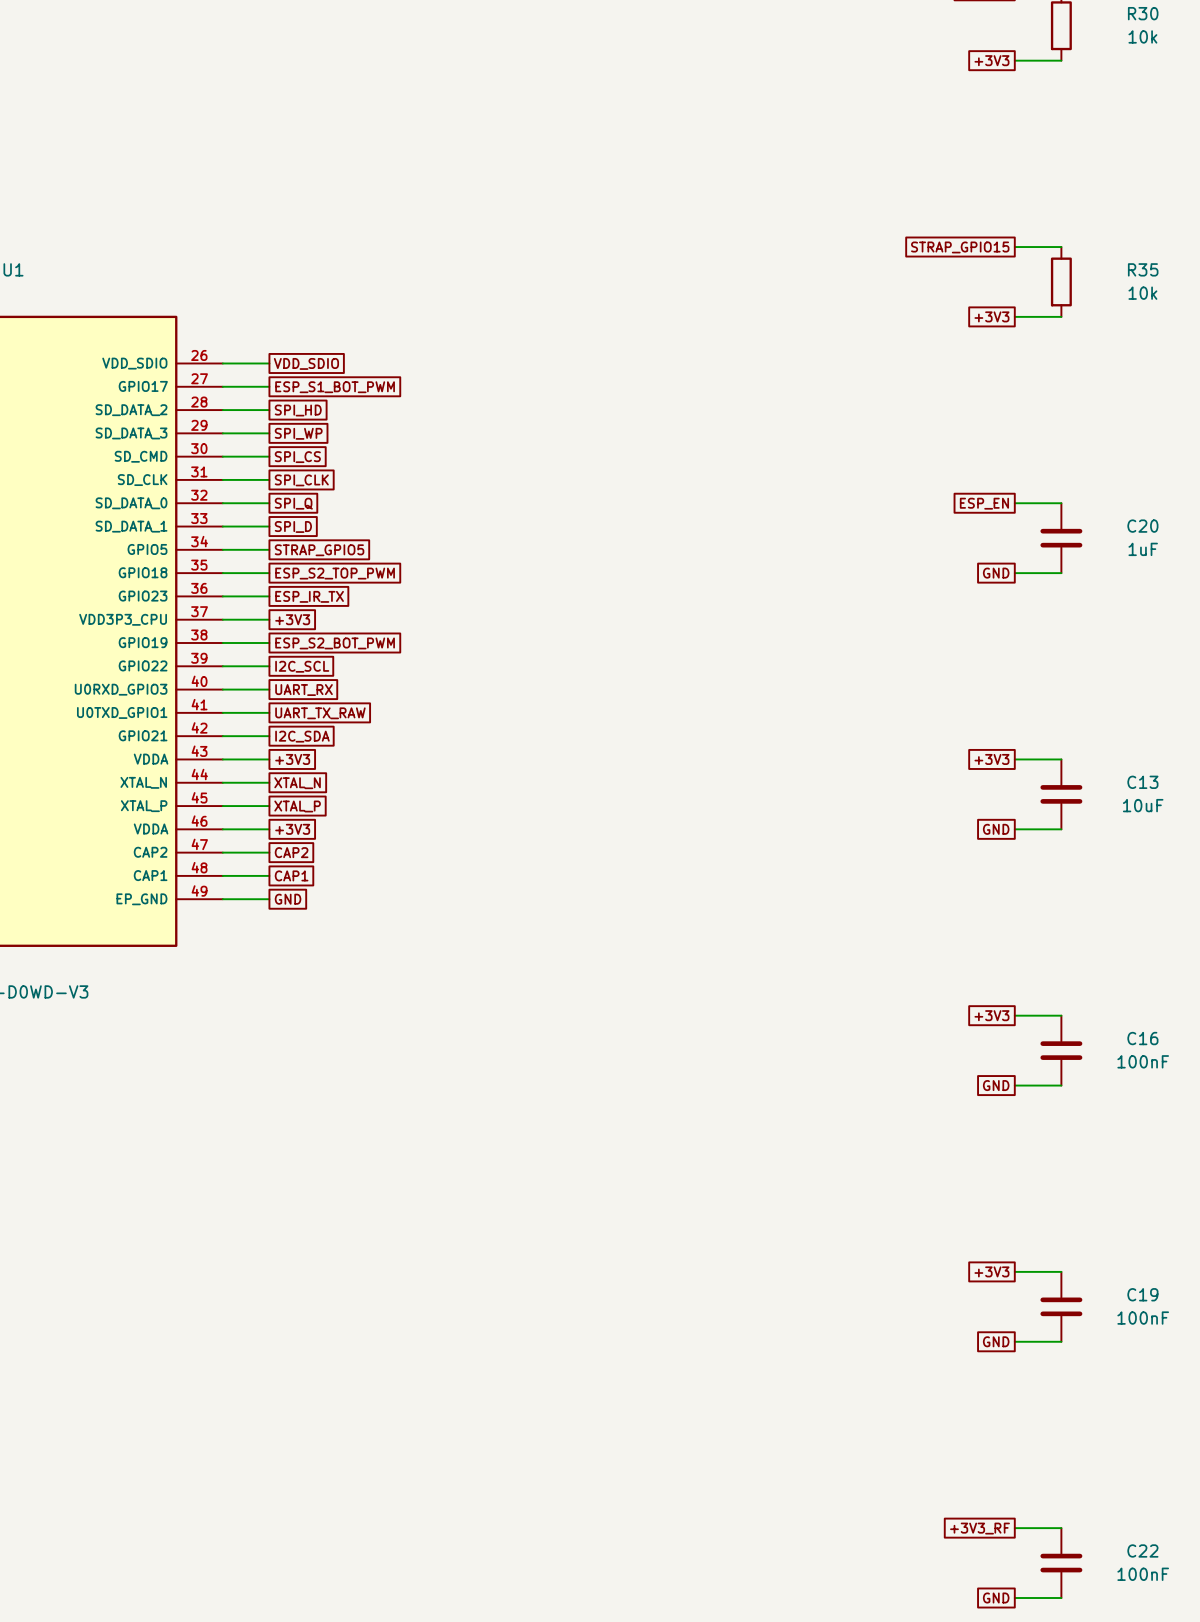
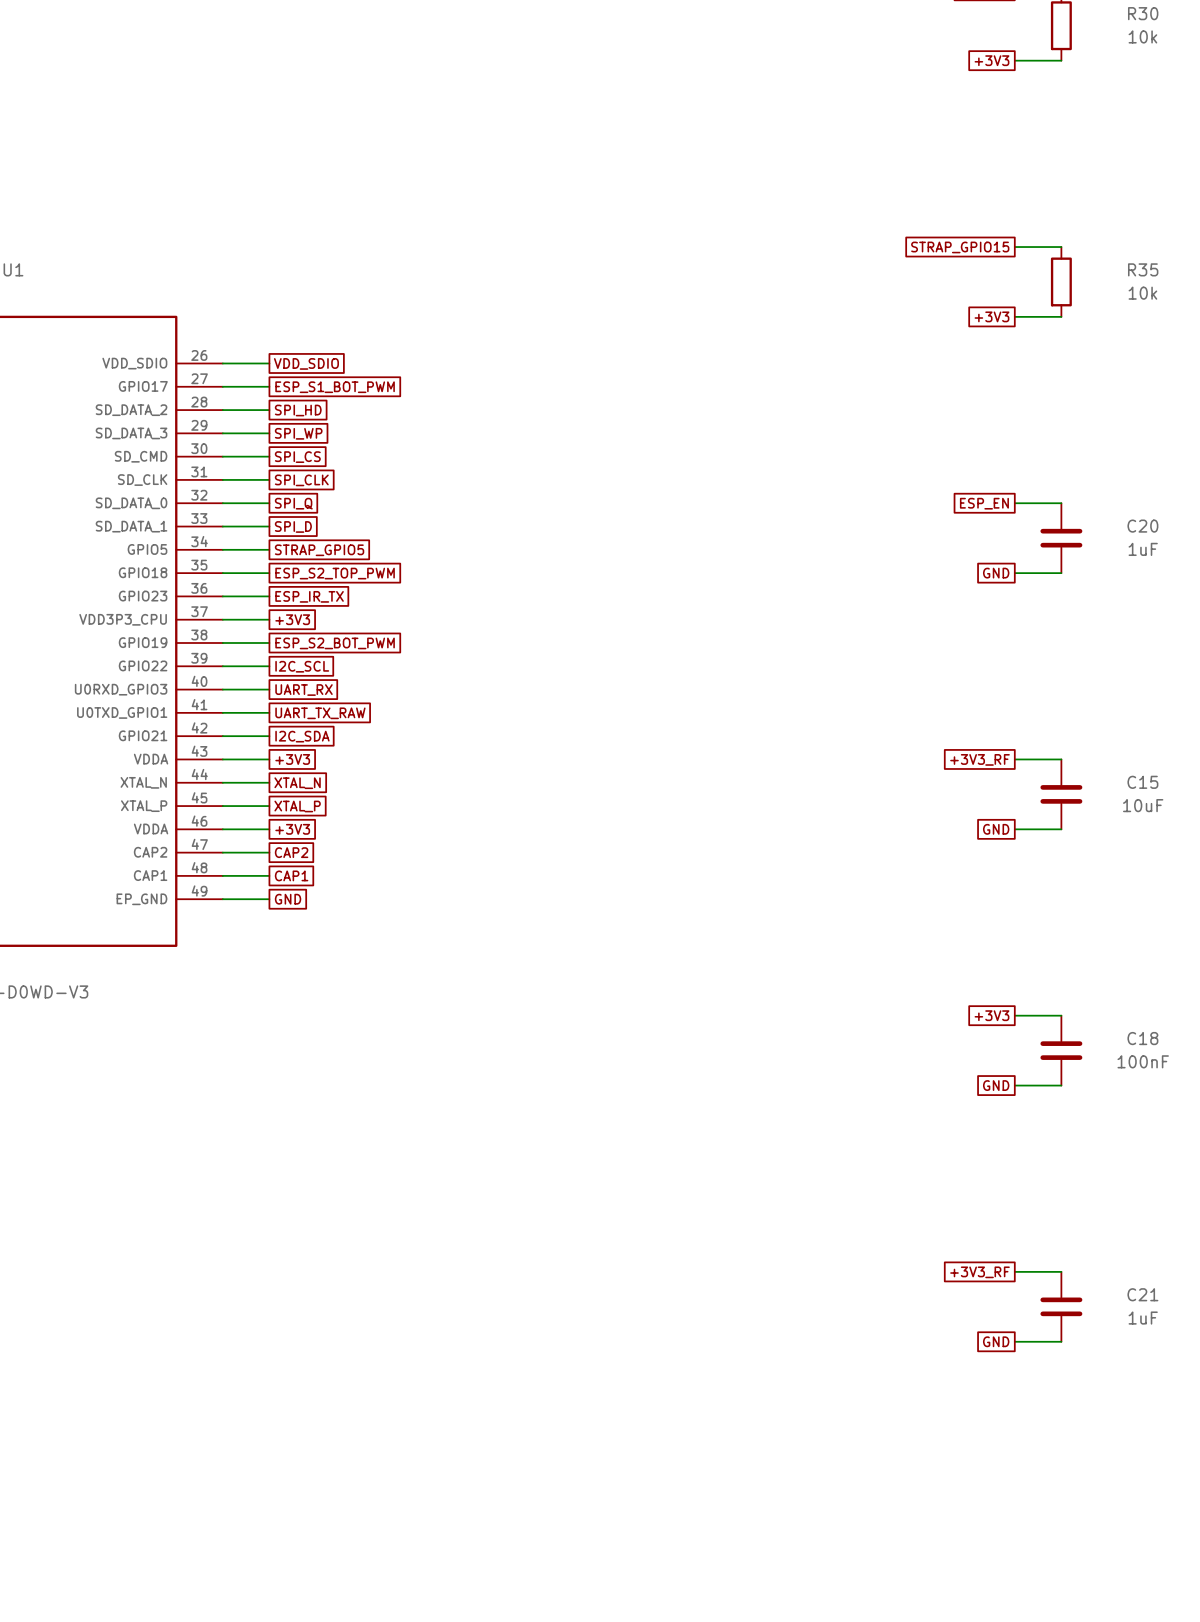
global label: +3V3 (991, 759) -> +3V3_RF (979, 759)
C13 name: C13 (1142, 782) -> C15 (1142, 782)
C16 name: C16 (1142, 1038) -> C18 (1142, 1038)
global label: +3V3 (991, 1271) -> +3V3_RF (979, 1272)
C19 name: C19 (1142, 1294) -> C21 (1142, 1294)
C19 value: 100nF (1143, 1318) -> 1uF (1143, 1318)
global label: +3V3_RF (979, 1528) -> none
wire: (1014, 1528) (1061, 1528) -> none
C22: 100nF (1061, 1563) -> none
global label: GND (996, 1598) -> none
wire: (1014, 1598) (1061, 1598) -> none

